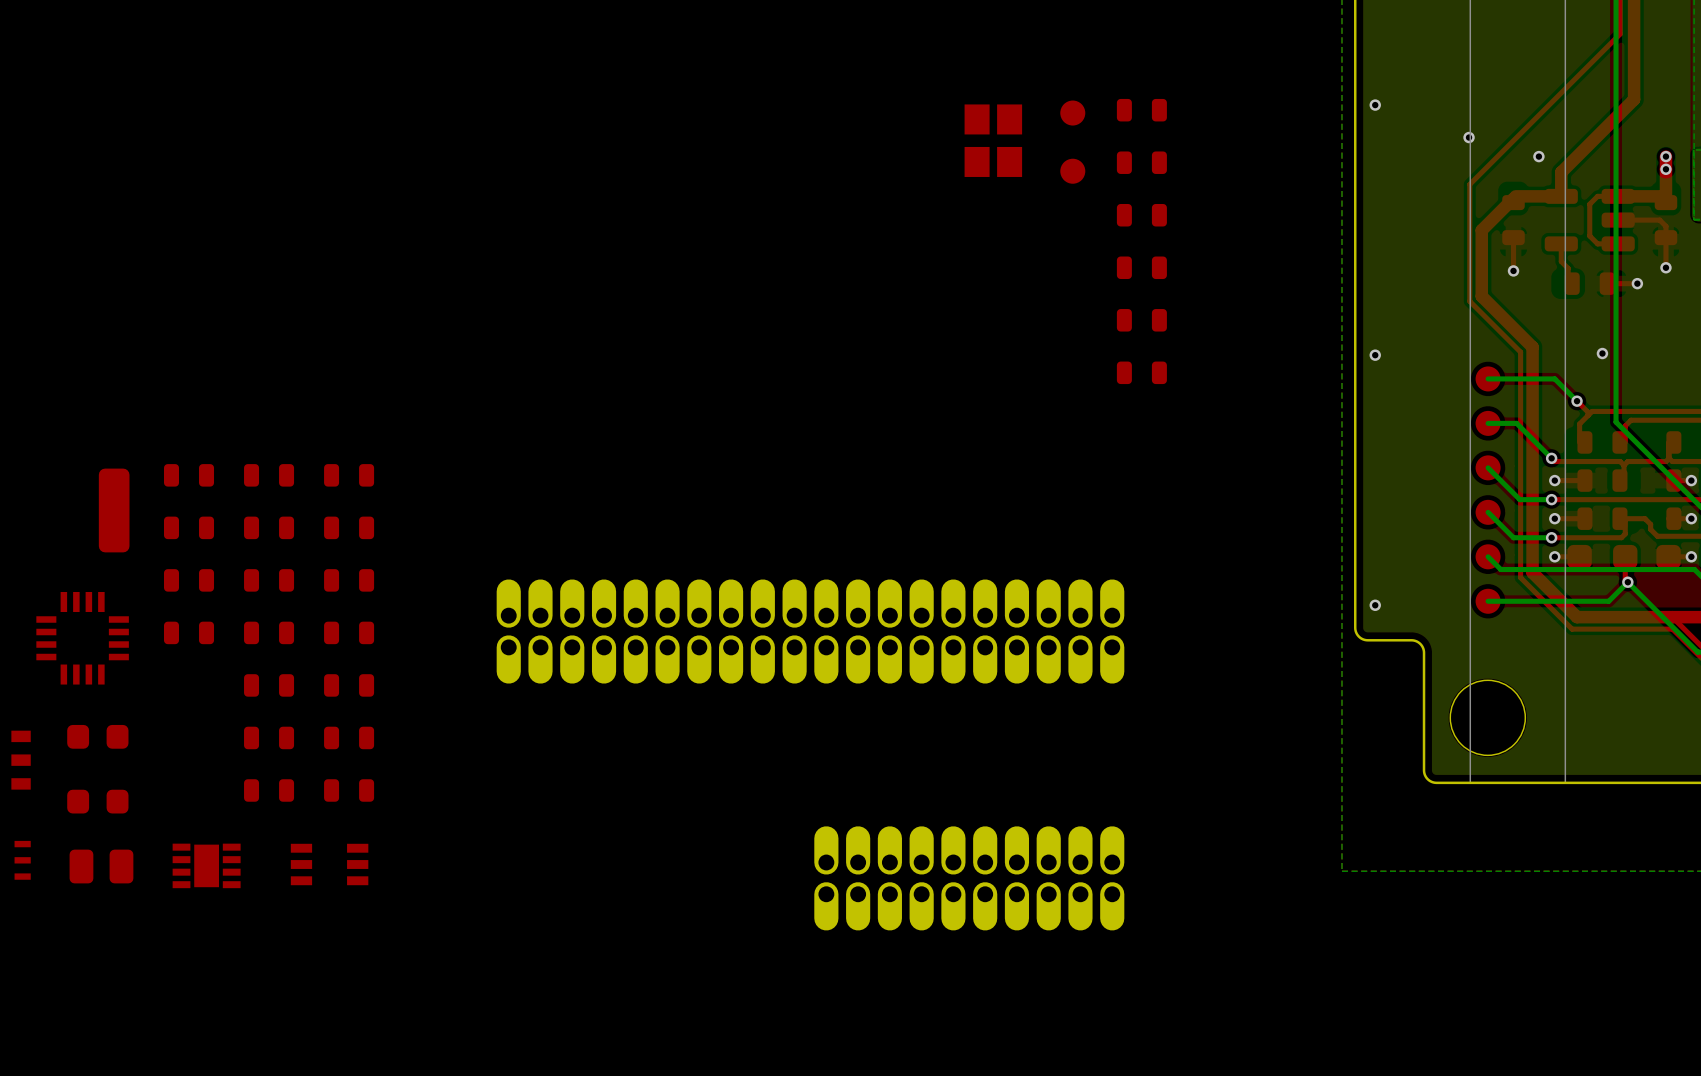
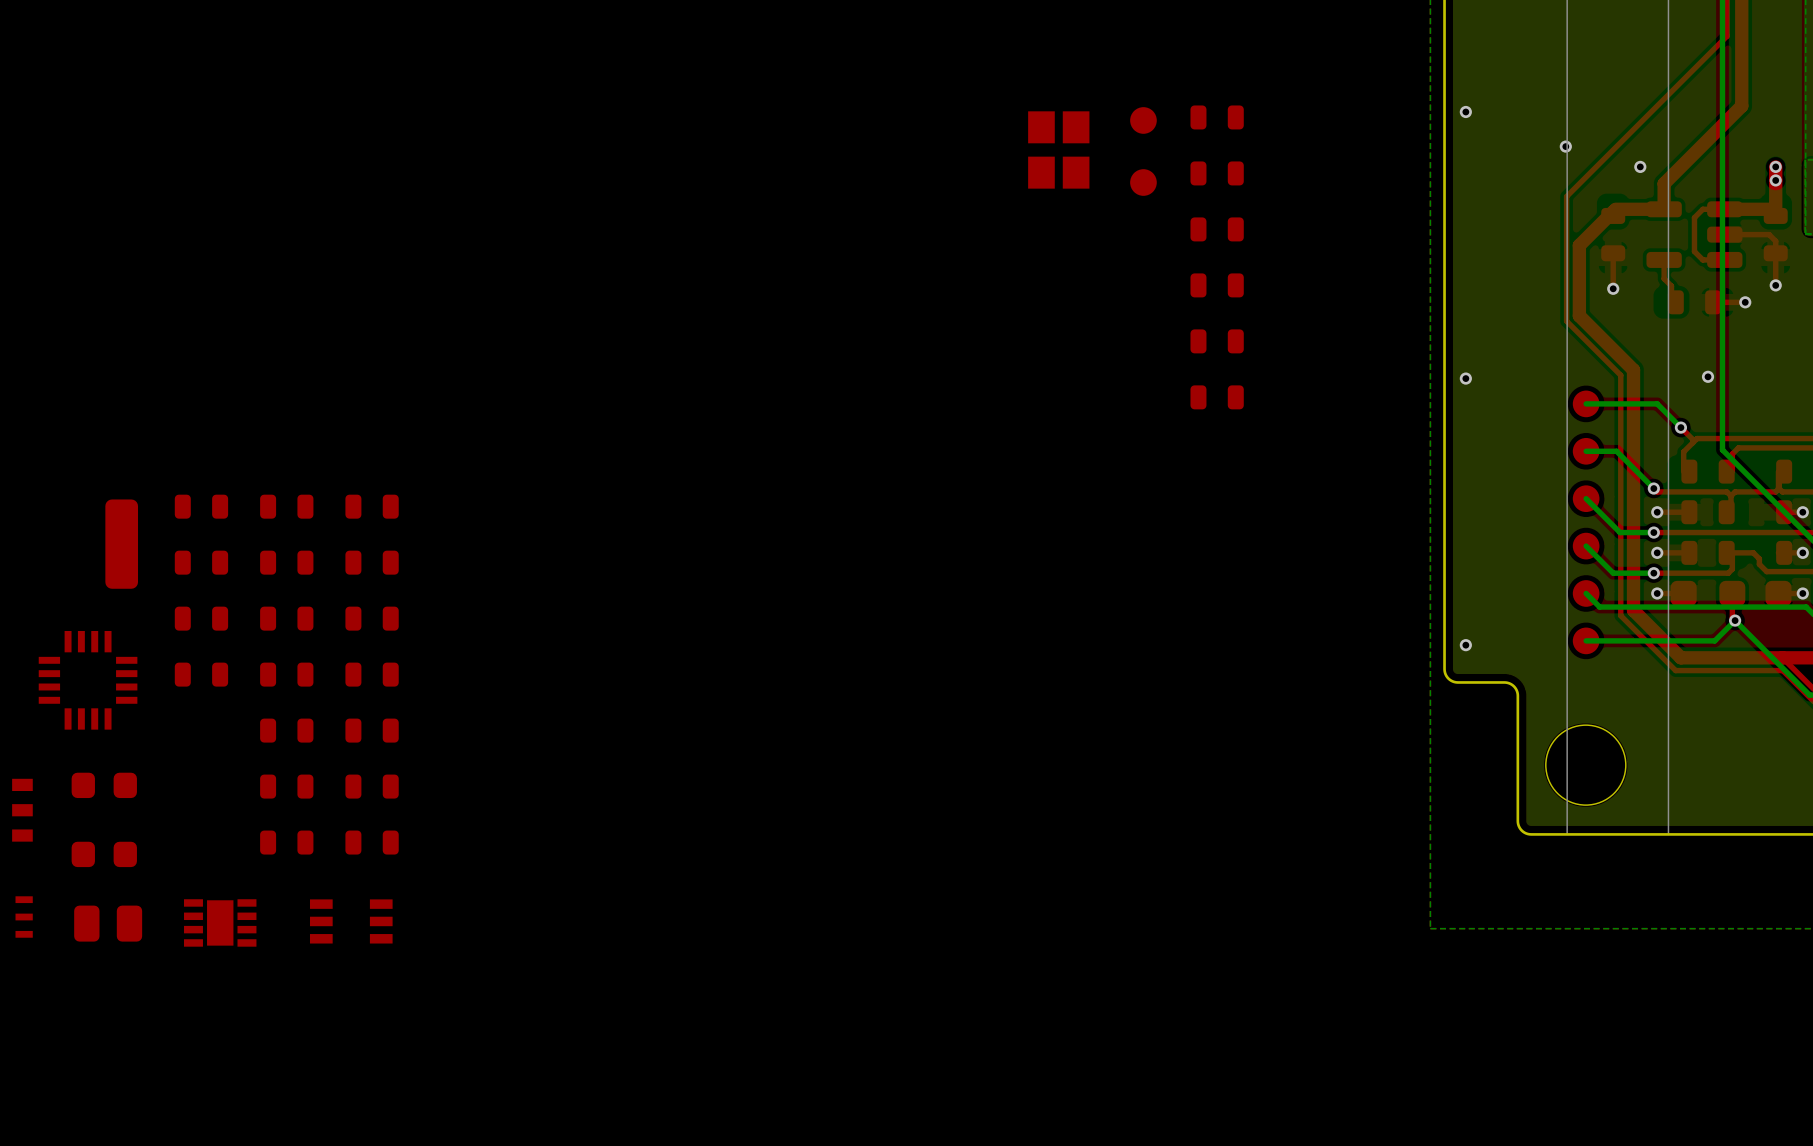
part: (810, 631) -> none
part: (969, 878) -> none

